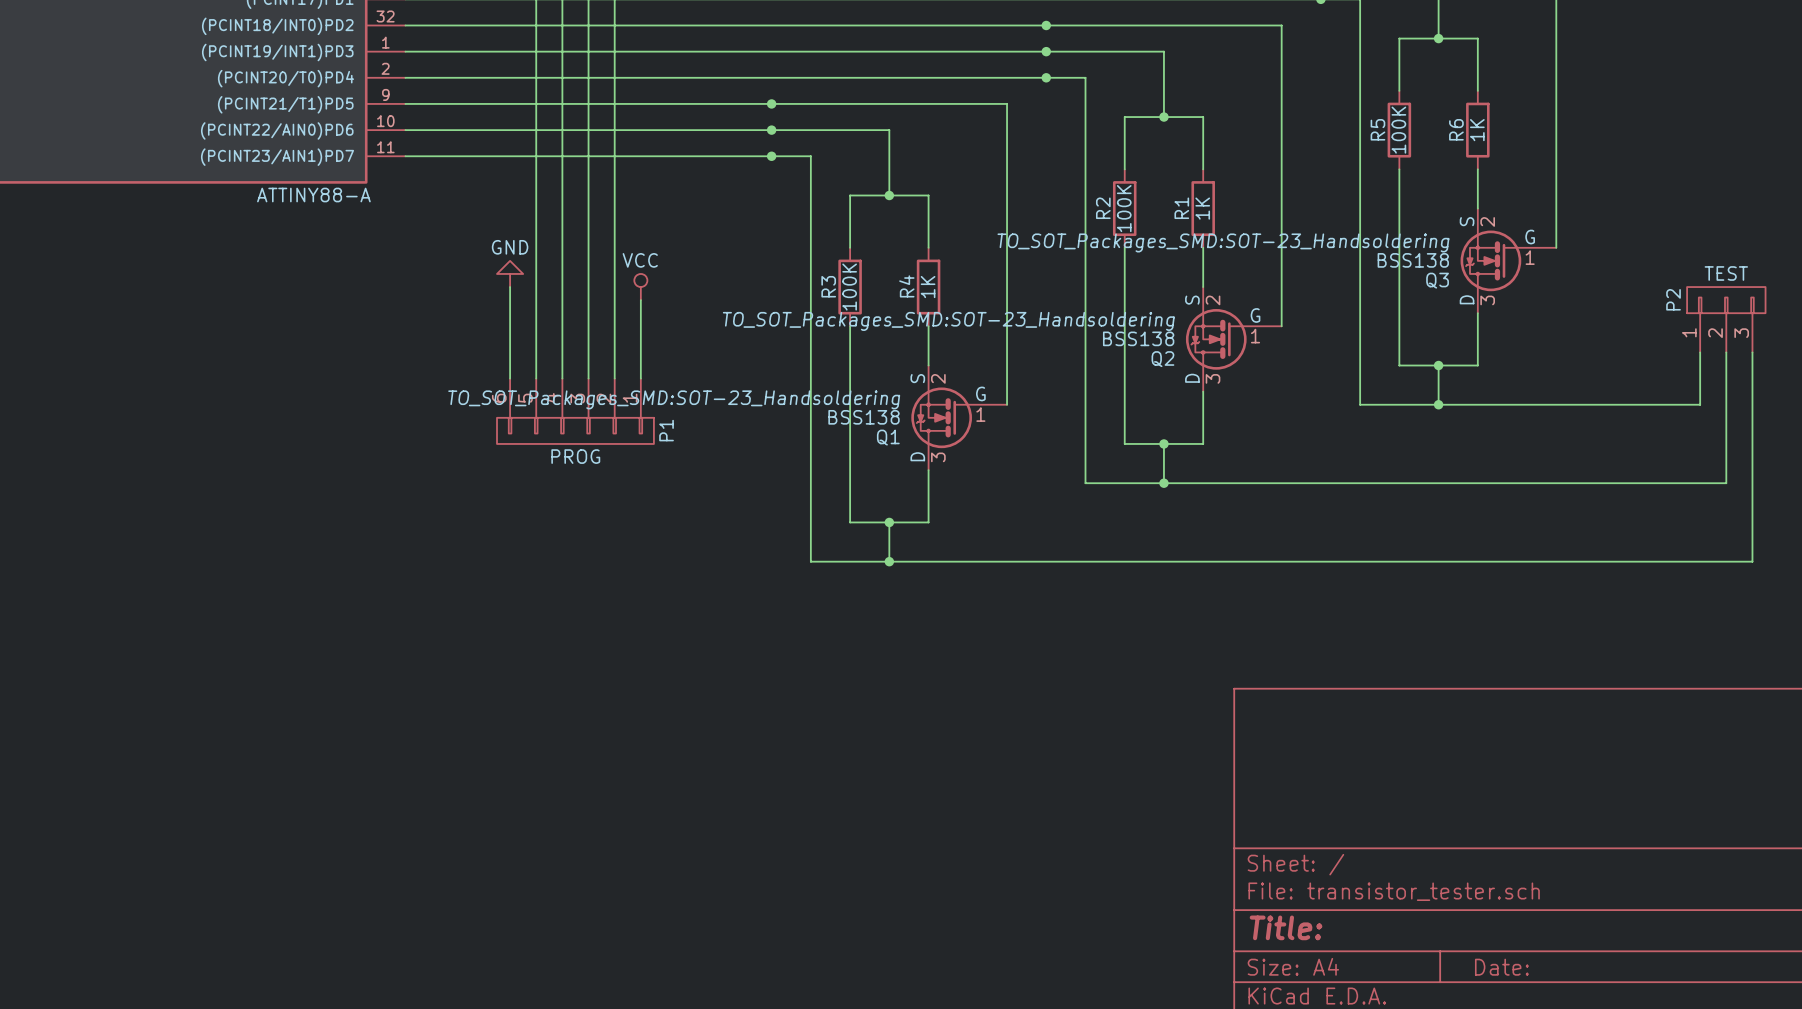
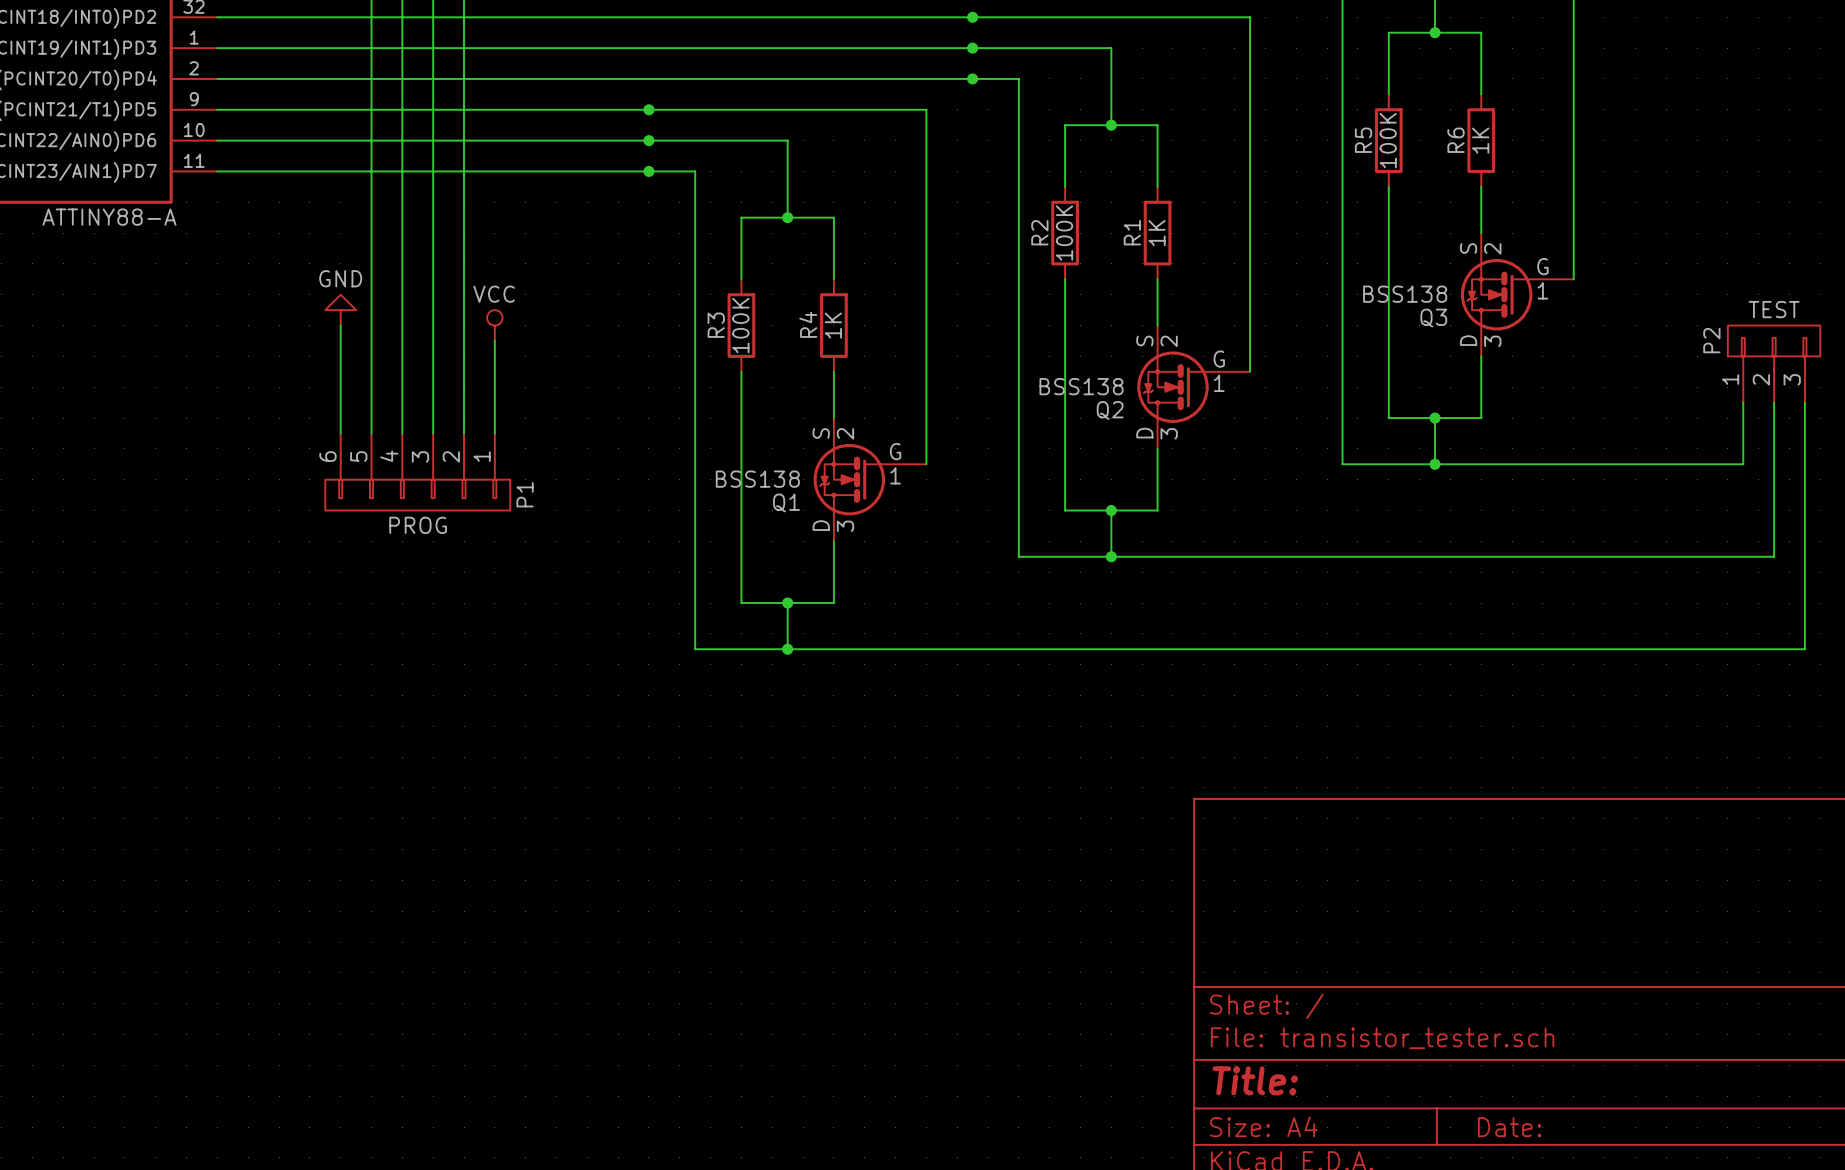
Q3 text: TO_SOT_Packages_SMD:SOT-23_Handsoldering (1223, 242) -> none
Q2 text: TO_SOT_Packages_SMD:SOT-23_Handsoldering (948, 321) -> none
Q1 text: TO_SOT_Packages_SMD:SOT-23_Handsoldering (674, 399) -> none

